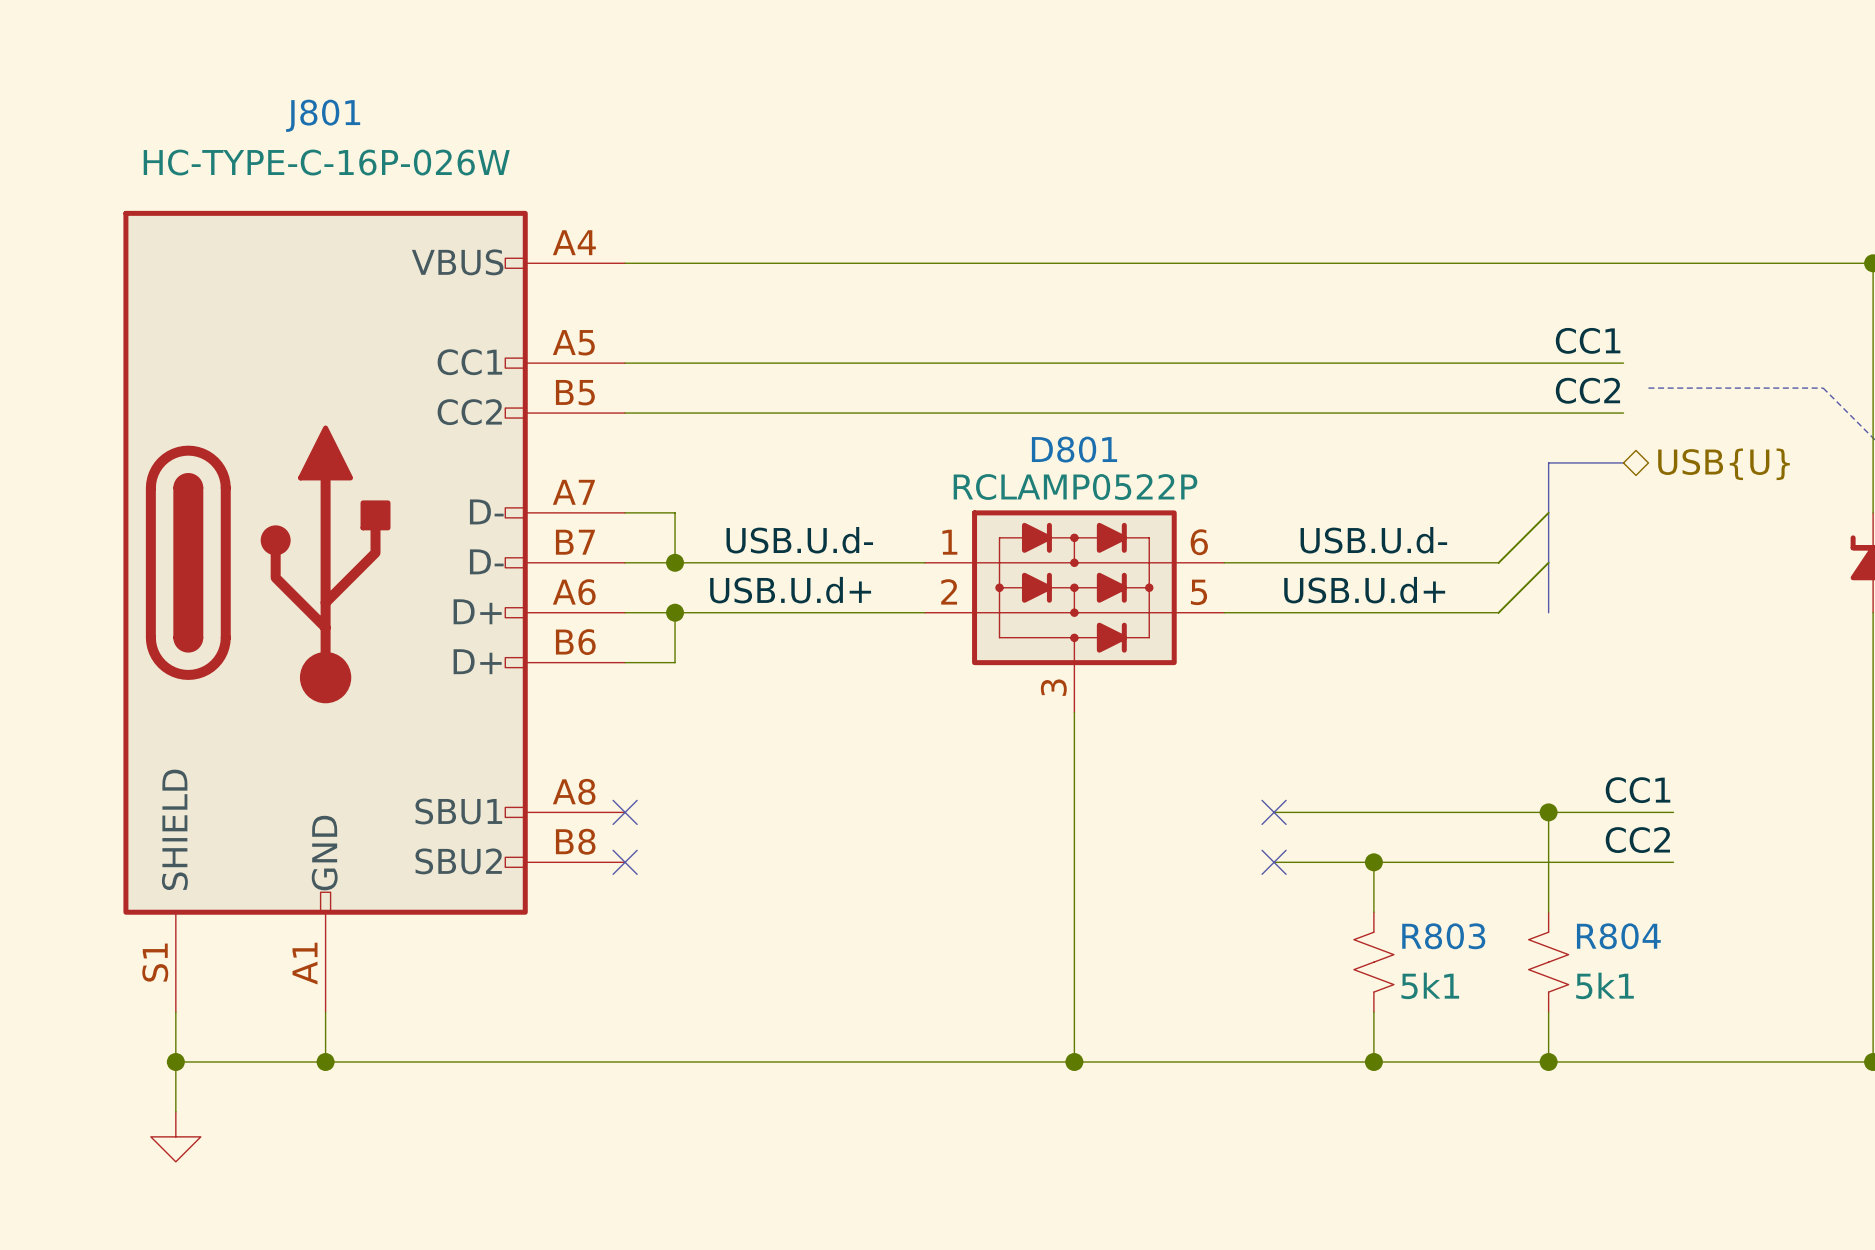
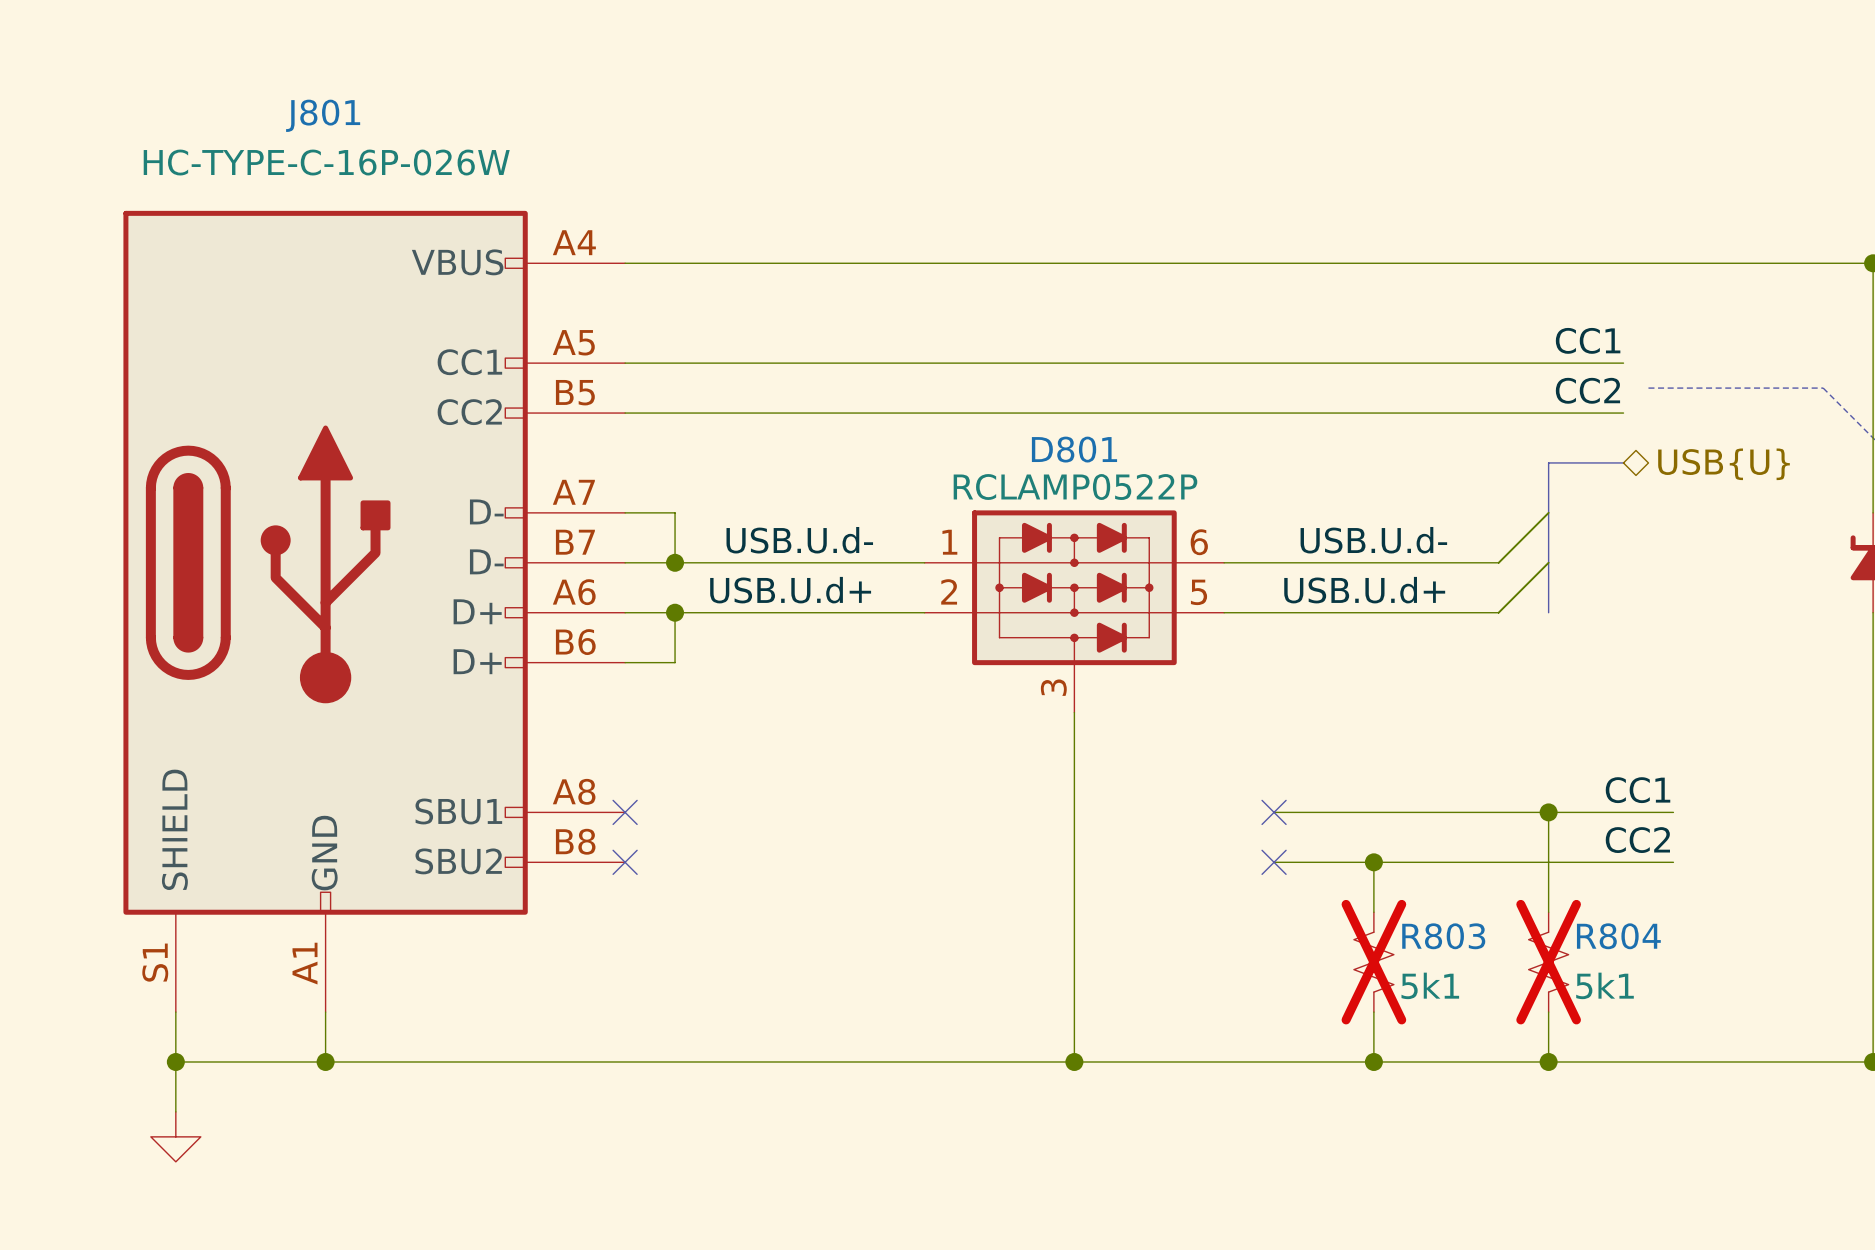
R803 do-not-place cross: none -> (1373, 962)
R804 do-not-place cross: none -> (1548, 962)

